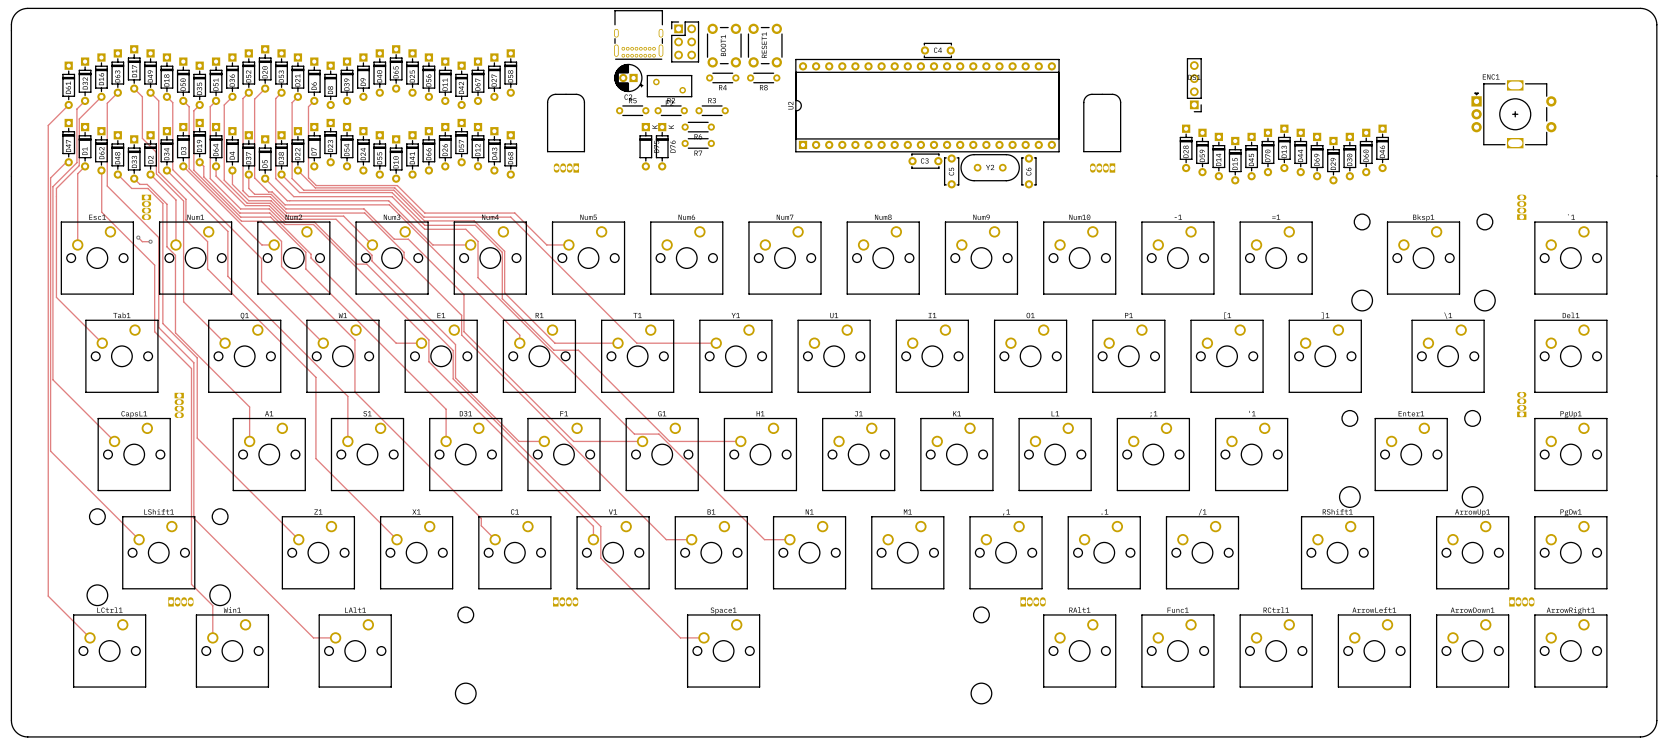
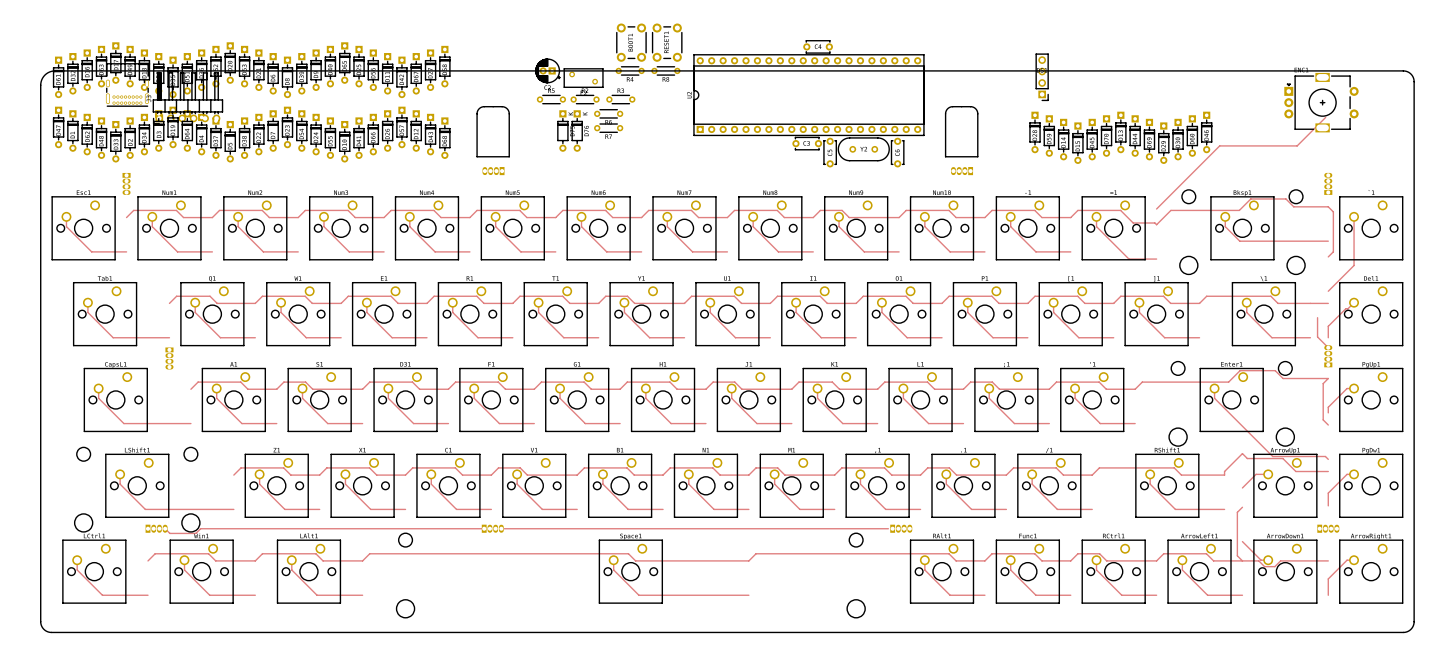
board edge: (27, 8) (1646, 9) (1654, 16) (1656, 24) (1655, 726) (1650, 733) (1640, 736) (21, 735) (13, 728) (11, 720) (11, 24) (16, 13) (27, 8) -> (55, 70) (44, 75) (40, 85) (40, 621) (42, 628) (47, 631) (1403, 632) (1408, 631) (1413, 625) (1414, 81) (1411, 75) (1407, 71) (55, 70)
part: (638, 34) -> none
part: (685, 41) -> none
track: (134, 88) (142, 96) (142, 138) (156, 152) (156, 173) (183, 201) (183, 301) (225, 343) -> (255, 337) (220, 337) (195, 312) (195, 302)
track: (265, 88) (254, 99) (254, 177) (268, 191) (272, 191) (285, 204) (389, 204) (519, 335) (519, 343) -> (512, 337) (477, 337) (452, 312) (452, 302)
track: (117, 92) (107, 103) (107, 186) (158, 237) (158, 327) (193, 362) (193, 518) (313, 637) (335, 637) -> (362, 595) (317, 595) (291, 570) (291, 560)
track: (150, 92) (158, 100) (158, 172) (185, 199) (185, 220) (203, 237) -> (126, 217) (133, 210) (176, 210)
track: (248, 92) (242, 98) (242, 190) (248, 196) (270, 196) (286, 213) (364, 213) (404, 252) (404, 257) (461, 315) (461, 334) (666, 539) (691, 539) -> (663, 509) (628, 509) (602, 484) (602, 474)
track: (281, 92) (275, 98) (275, 178) (293, 196) (392, 196) (424, 229) (465, 229) (478, 241) (478, 277) (634, 434) -> (190, 389) (198, 382) (240, 382) (247, 389) (276, 389) (283, 382) (305, 382) (312, 389) (362, 389) (369, 382) (412, 382) (419, 389) (448, 389) (455, 382) (498, 382) (505, 389) (534, 389) (541, 382) (552, 382)
part: none -> (127, 84)
board edge: (1112, 94) (1117, 96) (1120, 100) (1120, 127) -> (945, 113) (947, 108) (952, 106) (972, 106) (977, 113)
board edge: (1112, 94) (1089, 94) (1085, 97) (1083, 102) -> none
track: (101, 96) (79, 118) (79, 165) (56, 188) (56, 297) (102, 343) -> (169, 337) (113, 337) (87, 312) (87, 302)
track: (166, 96) (172, 102) (172, 169) (261, 258) (261, 281) (323, 343) -> (341, 337) (306, 337) (281, 312) (281, 302)
track: (232, 96) (224, 104) (224, 180) (247, 203) (270, 203) (286, 219) (336, 219) (371, 255) (371, 260) (455, 344) (455, 377) (519, 441) (544, 441) -> (534, 423) (499, 423) (474, 398) (474, 388)
track: (297, 96) (292, 102) (292, 178) (303, 190) (393, 190) (424, 220) (474, 220) (504, 251) (504, 292) (554, 343) (618, 343) -> (598, 337) (563, 337) (538, 312) (538, 302)
track: (85, 100) (76, 109) (76, 162) (52, 186) (52, 379) (114, 441) -> (190, 423) (123, 423) (98, 398) (98, 388)
track: (183, 100) (189, 106) (189, 168) (241, 221) (261, 221) (281, 241) (281, 266) (350, 335) -> (169, 303) (176, 296) (210, 296) (217, 303) (255, 303) (262, 296) (305, 296)
track: (216, 100) (210, 106) (210, 178) (240, 208) (269, 208) (284, 224) (313, 224) (428, 339) (428, 361) -> none
track: (314, 100) (308, 106) (308, 177) (316, 185) (397, 185) (424, 213) (514, 213) (546, 244) (568, 244) -> (555, 251) (520, 251) (495, 226) (495, 216)
board edge: (1083, 102) (1083, 127) -> none
track: (68, 104) (48, 125) (48, 596) (89, 637) -> (148, 595) (102, 595) (77, 570) (77, 560)
track: (199, 104) (193, 110) (193, 170) (240, 217) (270, 217) (305, 252) (305, 269) (446, 409) (446, 441) -> (448, 423) (413, 423) (388, 398) (388, 388)
part: none -> (187, 98)
board edge: (547, 127) (547, 100) (550, 96) (555, 94) (577, 94) (582, 97) (584, 127) -> (477, 113) (479, 108) (484, 106) (503, 106) (509, 113)
track: none -> (1325, 117) (1297, 145) (1219, 145) (1156, 208)
board edge: (547, 151) (584, 151) -> (477, 135) (477, 156) (509, 156) (509, 135)
board edge: (1083, 151) (1120, 151) -> (945, 135) (945, 156) (977, 156) (977, 135)
track: (68, 159) (50, 177) (50, 451) (139, 539) -> (233, 509) (145, 509) (120, 484) (120, 474)
track: (199, 162) (203, 166) (203, 176) (239, 213) (269, 213) (311, 254) (311, 258) (396, 343) (421, 343) -> (373, 318) (366, 312) (366, 302)
track: (85, 166) (77, 173) (77, 244) -> (126, 251) (91, 251) (66, 226) (66, 216)
track: (183, 166) (261, 244) (274, 244) -> (298, 251) (263, 251) (238, 226) (238, 216)
track: (216, 166) (216, 176) (245, 205) (269, 205) (285, 222) (314, 222) (356, 264) (366, 264) (453, 350) (453, 378) (600, 526) (600, 558) -> (517, 474) (517, 484) (523, 490)
part position: (566, 168) -> (493, 171)
part position: (1102, 168) -> (962, 171)
track: (101, 170) (101, 212) (154, 265) (154, 331) (191, 368) (191, 584) (212, 605) (212, 637) -> (255, 595) (209, 595) (184, 570) (184, 560)
track: (166, 170) (227, 231) (227, 276) (347, 396) (347, 441) -> (362, 423) (327, 423) (302, 398) (302, 388)
track: (232, 170) (232, 184) (248, 200) (271, 200) (286, 216) (343, 216) (372, 244) -> (384, 251) (349, 251) (323, 226) (323, 216)
track: (297, 170) (315, 187) (394, 187) (424, 217) (510, 217) (636, 343) (716, 343) -> (684, 337) (649, 337) (624, 312) (624, 302)
track: (117, 174) (131, 188) (147, 188) (162, 203) (162, 323) (197, 357) (197, 438) (298, 539) -> (319, 509) (284, 509) (259, 484) (259, 474)
track: (150, 174) (175, 199) (175, 244) -> (212, 251) (177, 251) (152, 226) (152, 216)
track: (248, 174) (248, 188) (254, 194) (271, 194) (285, 208) (364, 208) (394, 239) (408, 239) (463, 294) (463, 331) (573, 441) (642, 441) -> (620, 423) (585, 423) (560, 398) (560, 388)
track: (281, 174) (299, 192) (392, 192) (424, 225) (475, 225) (502, 252) (502, 298) (553, 350) (578, 350) (669, 441) (740, 441) -> (705, 423) (671, 423) (645, 398) (645, 388)
track: (134, 178) (139, 184) (147, 184) (166, 204) (166, 246) (175, 255) (175, 332) (249, 407) (249, 441) -> (276, 423) (241, 423) (216, 398) (216, 388)
track: (265, 178) (287, 200) (388, 200) (432, 244) (470, 244) -> (469, 251) (435, 251) (409, 226) (409, 216)
track: (138, 237) (142, 241) (150, 241) -> none
via: (138, 237) -> none
via: (150, 241) -> none
track: (207, 241) (207, 269) (315, 377) (315, 458) (396, 539) -> (405, 509) (370, 509) (345, 484) (345, 474)
track: none -> (179, 213) (183, 217) (212, 217) (219, 210) (262, 210) (269, 217) (298, 217) (305, 210) (348, 210) (355, 217) (384, 217) (391, 210) (433, 210) (441, 217) (469, 217) (477, 210) (519, 210) (526, 217) (555, 217) (562, 210) (605, 210) (612, 217) (641, 217) (648, 210) (691, 210) (698, 217) (727, 217) (734, 210) (777, 210) (784, 217) (813, 217) (820, 210) (842, 210) (849, 217) (899, 217) (906, 210) (948, 210) (956, 217) (984, 217) (992, 210) (1034, 210) (1041, 217) (1070, 217) (1077, 210) (1120, 210) (1133, 222) (1154, 222) (1156, 224) (1170, 210) (1239, 210) (1250, 198) (1285, 198) (1293, 206) (1328, 206) (1333, 211) (1333, 251) (1328, 256)
track: none -> (581, 216) (581, 226) (606, 251) (641, 251)
track: none -> (667, 216) (667, 226) (692, 251) (727, 251)
track: none -> (753, 216) (753, 226) (778, 251) (813, 251)
track: none -> (839, 216) (839, 226) (864, 251) (899, 251)
track: none -> (924, 216) (924, 226) (950, 251) (984, 251)
track: none -> (1010, 216) (1010, 226) (1035, 251) (1070, 251)
track: none -> (1096, 216) (1096, 226) (1128, 259) (1156, 259)
track: none -> (1225, 216) (1225, 226) (1239, 241) (1328, 241)
track: none -> (1354, 216) (1354, 265) (1328, 291)
track: (354, 339) (354, 392) (481, 518) (481, 525) (495, 539) -> (491, 509) (456, 509) (431, 484) (431, 474)
track: none -> (308, 299) (312, 303) (341, 303) (348, 296) (391, 296) (398, 303) (426, 303) (434, 296) (476, 296) (483, 303) (512, 303) (519, 296) (562, 296) (569, 303) (598, 303) (605, 296) (627, 296) (634, 303) (684, 303) (691, 296) (734, 296) (741, 303) (770, 303) (777, 296) (820, 296) (827, 303) (856, 303) (863, 296) (906, 296) (913, 303) (942, 303) (949, 296) (991, 296) (999, 303) (1027, 303) (1035, 296) (1077, 296) (1084, 303) (1113, 303) (1120, 296) (1163, 296) (1170, 303) (1199, 303) (1206, 296) (1270, 296) (1278, 303) (1328, 303)
track: none -> (710, 302) (710, 312) (735, 337) (770, 337)
track: none -> (796, 302) (796, 312) (821, 337) (856, 337)
track: none -> (881, 302) (881, 312) (907, 337) (942, 337)
track: none -> (967, 302) (967, 312) (993, 337) (1027, 337)
track: none -> (1053, 302) (1053, 312) (1078, 337) (1113, 337)
track: none -> (1139, 302) (1139, 312) (1164, 337) (1199, 337)
track: none -> (1246, 302) (1246, 312) (1271, 337) (1310, 337)
track: none -> (1354, 302) (1328, 326) (1328, 337)
track: none -> (1317, 317) (1317, 336) (1328, 347)
track: (450, 383) (593, 526) (593, 539) -> (392, 337) (426, 337)
part position: (179, 405) -> (169, 358)
track: (658, 434) (764, 539) (789, 539) -> (748, 509) (714, 509) (688, 484) (688, 474)
track: none -> (574, 382) (584, 382) (591, 389) (620, 389) (627, 382) (669, 382) (677, 389) (705, 389) (713, 382) (734, 382) (741, 389) (791, 389) (798, 382) (832, 382) (839, 389) (877, 389) (884, 382) (927, 382) (934, 389) (963, 389) (970, 382) (992, 382) (999, 389) (1049, 389) (1056, 382) (1099, 382) (1106, 389) (1135, 389) (1142, 382) (1228, 382) (1240, 370) (1275, 370) (1283, 378) (1328, 378) (1323, 383) (1323, 419) (1328, 425)
track: none -> (731, 388) (731, 398) (756, 423) (791, 423)
track: none -> (817, 388) (817, 398) (842, 423) (877, 423)
track: none -> (903, 388) (903, 398) (928, 423) (963, 423)
track: none -> (989, 388) (989, 398) (1014, 423) (1049, 423)
track: none -> (1075, 388) (1075, 398) (1100, 423) (1135, 423)
track: none -> (1214, 388) (1214, 398) (1272, 456) (1325, 456) (1328, 459)
track: none -> (1354, 388) (1347, 388) (1328, 407) (1328, 412)
track: none -> (1328, 471) (1295, 471) (1282, 458) (1247, 458) (1242, 453) (1224, 471) (1224, 475) (1181, 475) (1174, 467) (1099, 467) (1092, 475) (1063, 475) (1056, 467) (1013, 467) (1006, 475) (956, 475) (949, 467) (927, 467) (920, 475) (891, 475) (884, 467) (841, 467) (834, 475) (784, 475) (777, 467) (756, 467) (748, 475) (720, 475) (712, 467) (670, 467) (663, 475) (634, 475) (627, 467) (584, 467) (577, 475) (527, 475) (520, 467) (498, 467) (491, 475) (462, 475) (455, 467) (412, 467) (405, 475) (376, 475) (369, 467) (326, 467) (319, 475) (290, 475) (283, 467) (240, 467) (233, 475)
track: none -> (774, 474) (774, 484) (799, 509) (834, 509)
track: none -> (860, 474) (860, 484) (885, 509) (920, 509)
track: none -> (946, 474) (946, 484) (971, 509) (1006, 509)
track: none -> (1032, 474) (1032, 484) (1057, 509) (1092, 509)
track: none -> (1150, 474) (1150, 484) (1175, 509) (1224, 509)
track: none -> (1268, 474) (1256, 474) (1242, 487)
track: none -> (1354, 474) (1347, 474) (1328, 493) (1328, 505)
track: none -> (1242, 507) (1237, 512) (1237, 555) (1242, 560)
track: (622, 579) (680, 637) (703, 637) -> (542, 509) (577, 509)
track: none -> (165, 528) (169, 533) (195, 533) (200, 528) (484, 528)
track: none -> (501, 528) (888, 528)
track: none -> (1242, 541) (1261, 560) (1268, 560)
track: none -> (613, 560) (613, 570) (638, 595) (748, 595)
track: none -> (924, 560) (924, 570) (950, 595) (984, 595)
track: none -> (1010, 560) (1010, 570) (1035, 595) (1070, 595)
track: none -> (1096, 560) (1096, 570) (1121, 595) (1156, 595)
track: none -> (1182, 560) (1182, 570) (1207, 595) (1242, 595)
track: none -> (1354, 560) (1347, 560) (1328, 578) (1328, 595)
track: none -> (148, 560) (155, 553) (208, 553) (215, 560) (255, 560) (262, 553) (315, 553) (323, 560) (362, 560) (369, 553) (628, 553) (635, 560) (748, 560) (756, 553) (948, 553) (956, 560) (984, 560) (992, 553) (1034, 553) (1041, 560) (1070, 560) (1077, 553) (1099, 553) (1106, 560) (1156, 560) (1163, 553) (1206, 553) (1213, 560) (1258, 560) (1264, 566) (1274, 566) (1280, 560) (1328, 560)

